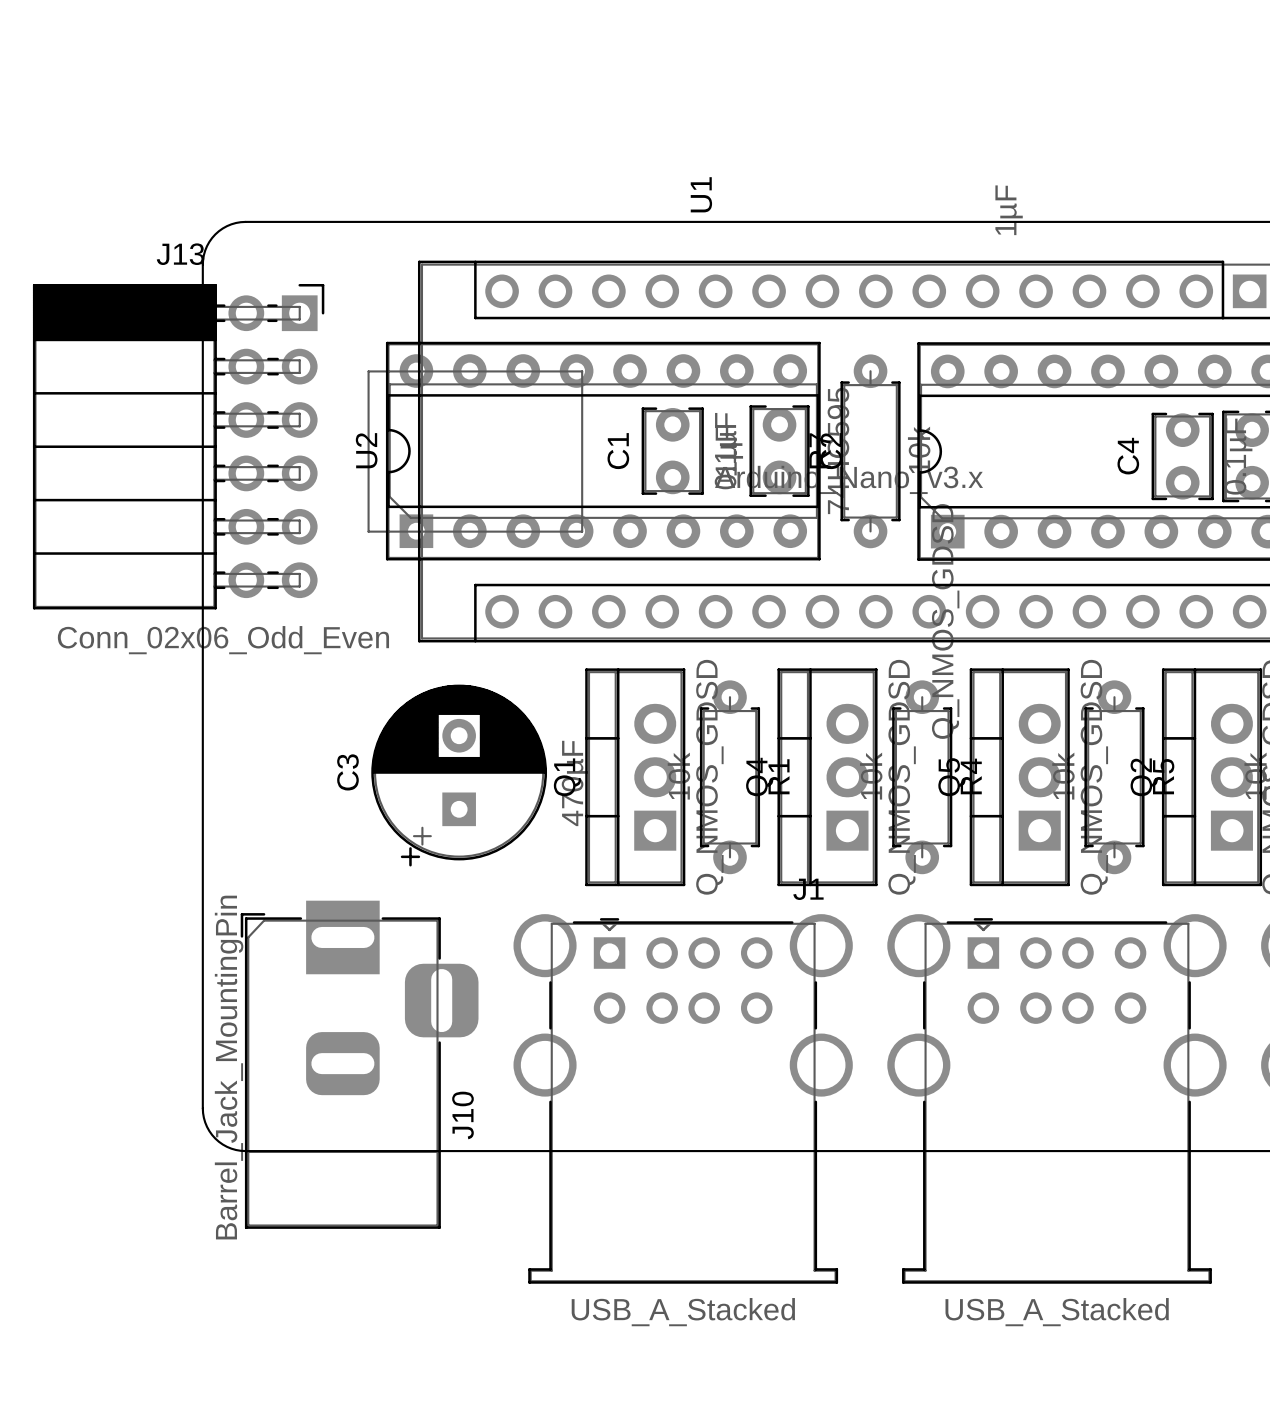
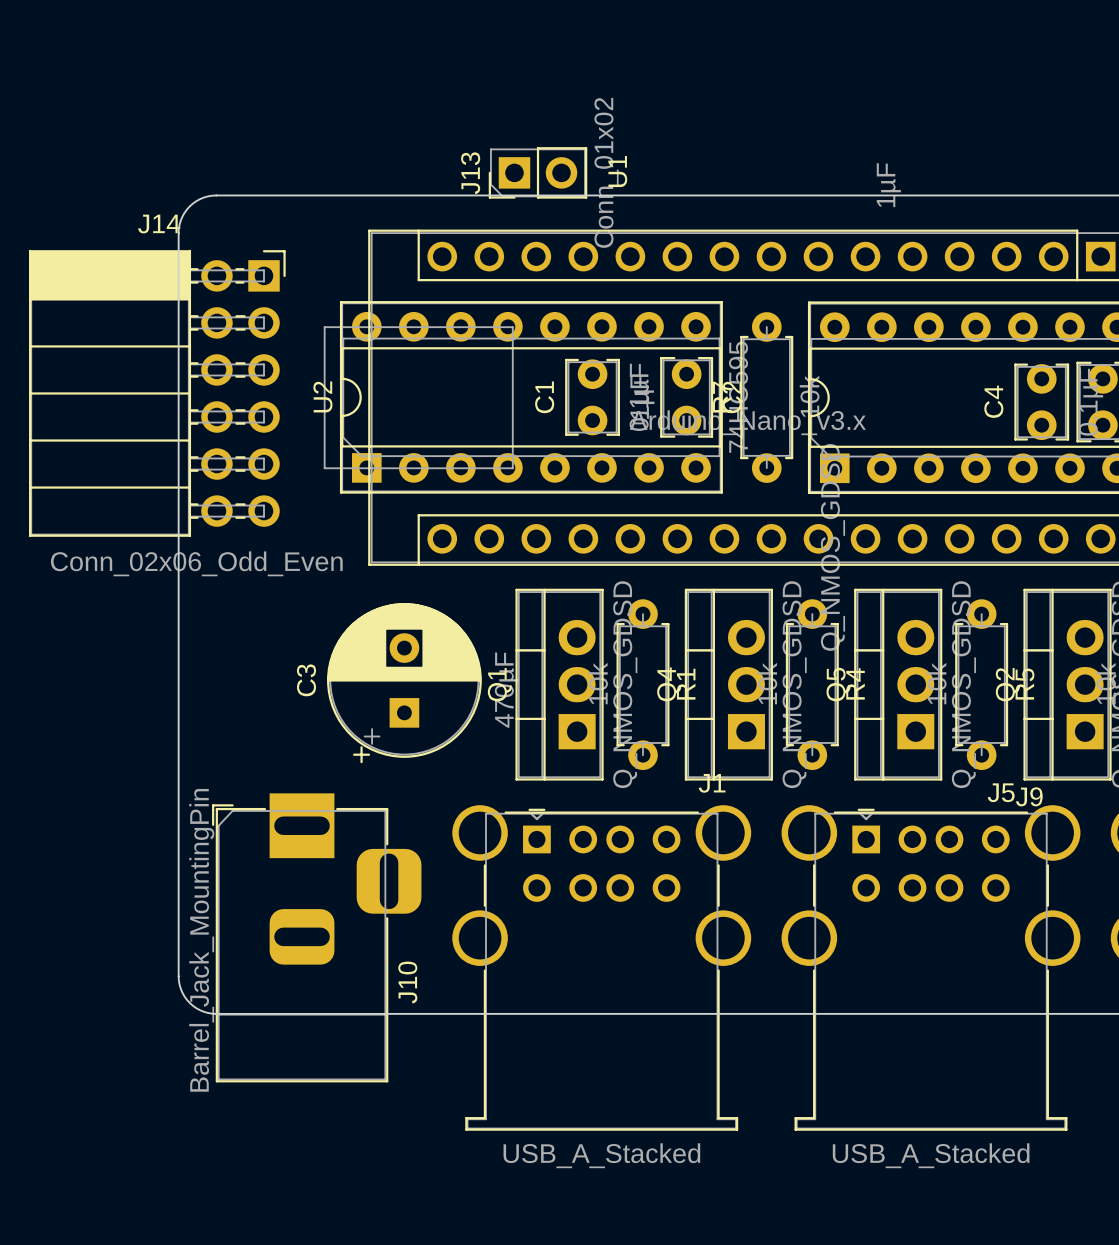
J13: none -> Conn_01x02 (538, 172)
J13 name: J13 (180, 254) -> J14 (159, 224)
text: none -> J5 (1001, 792)
text: none -> J9 (1029, 796)

